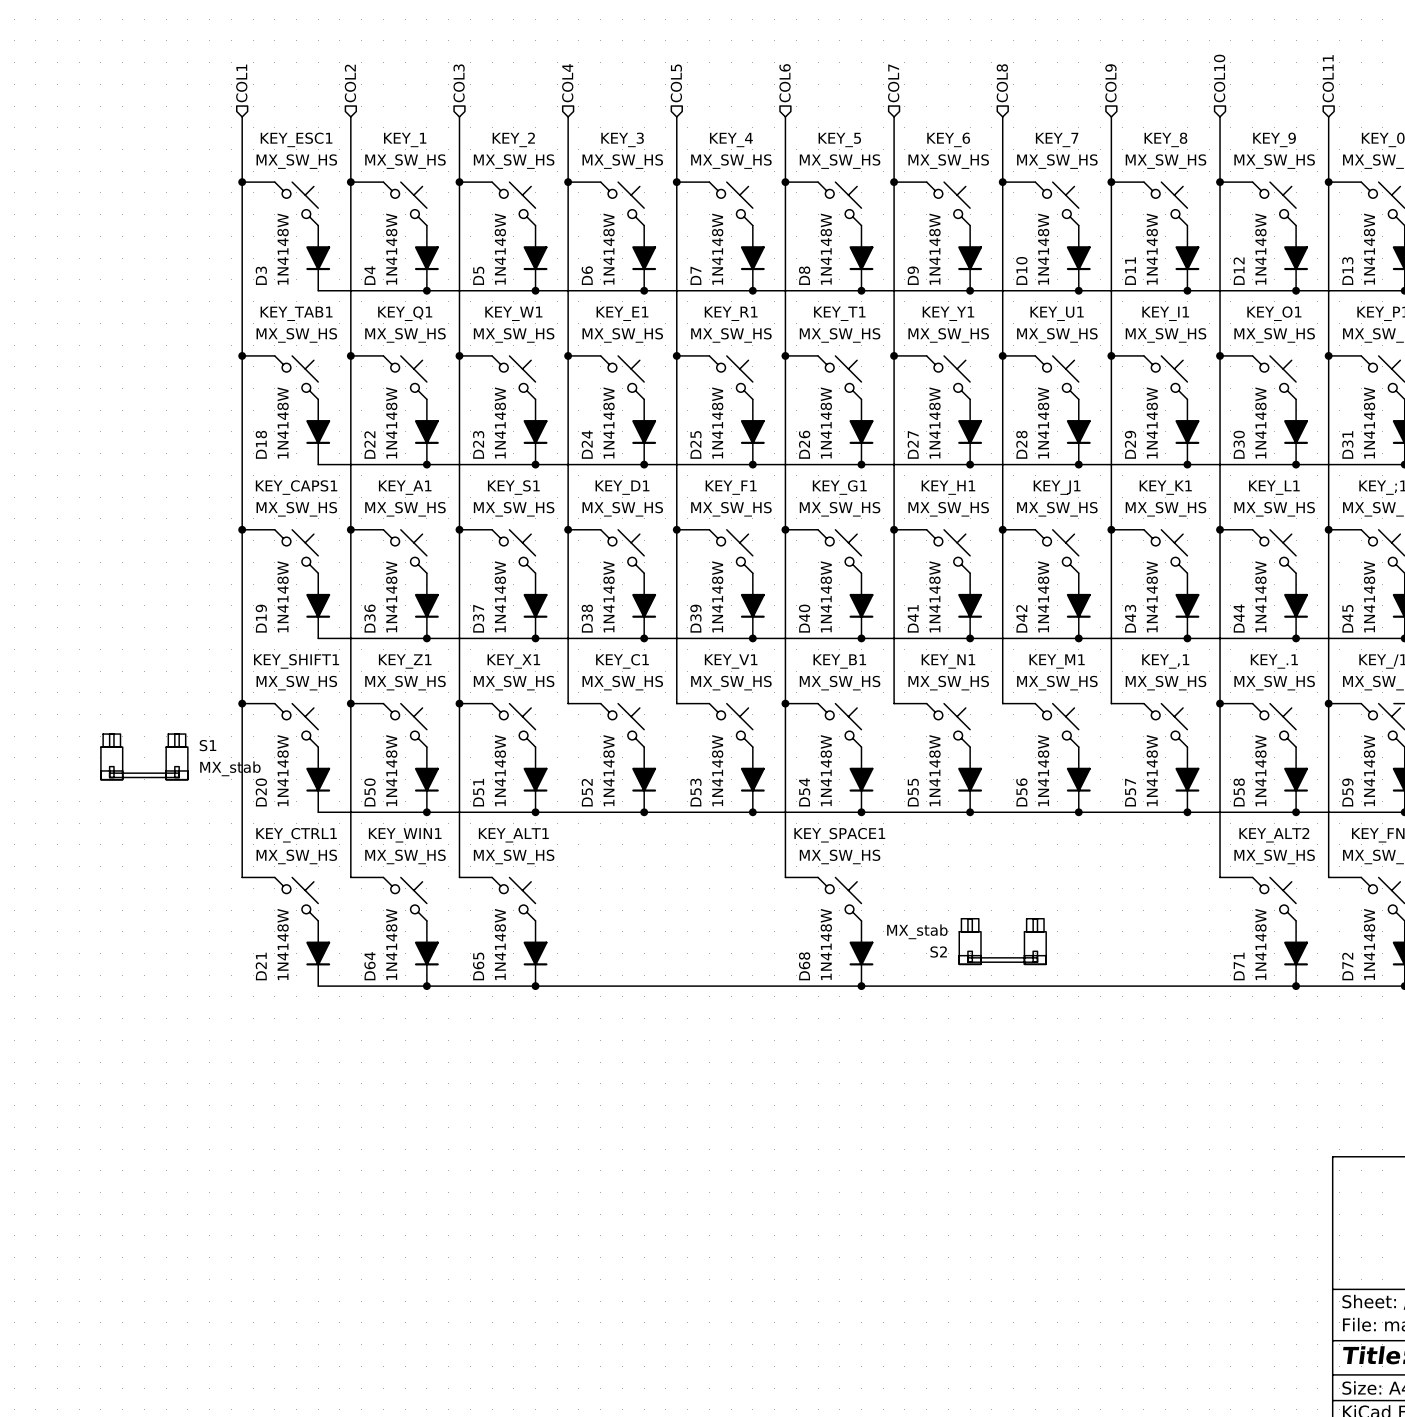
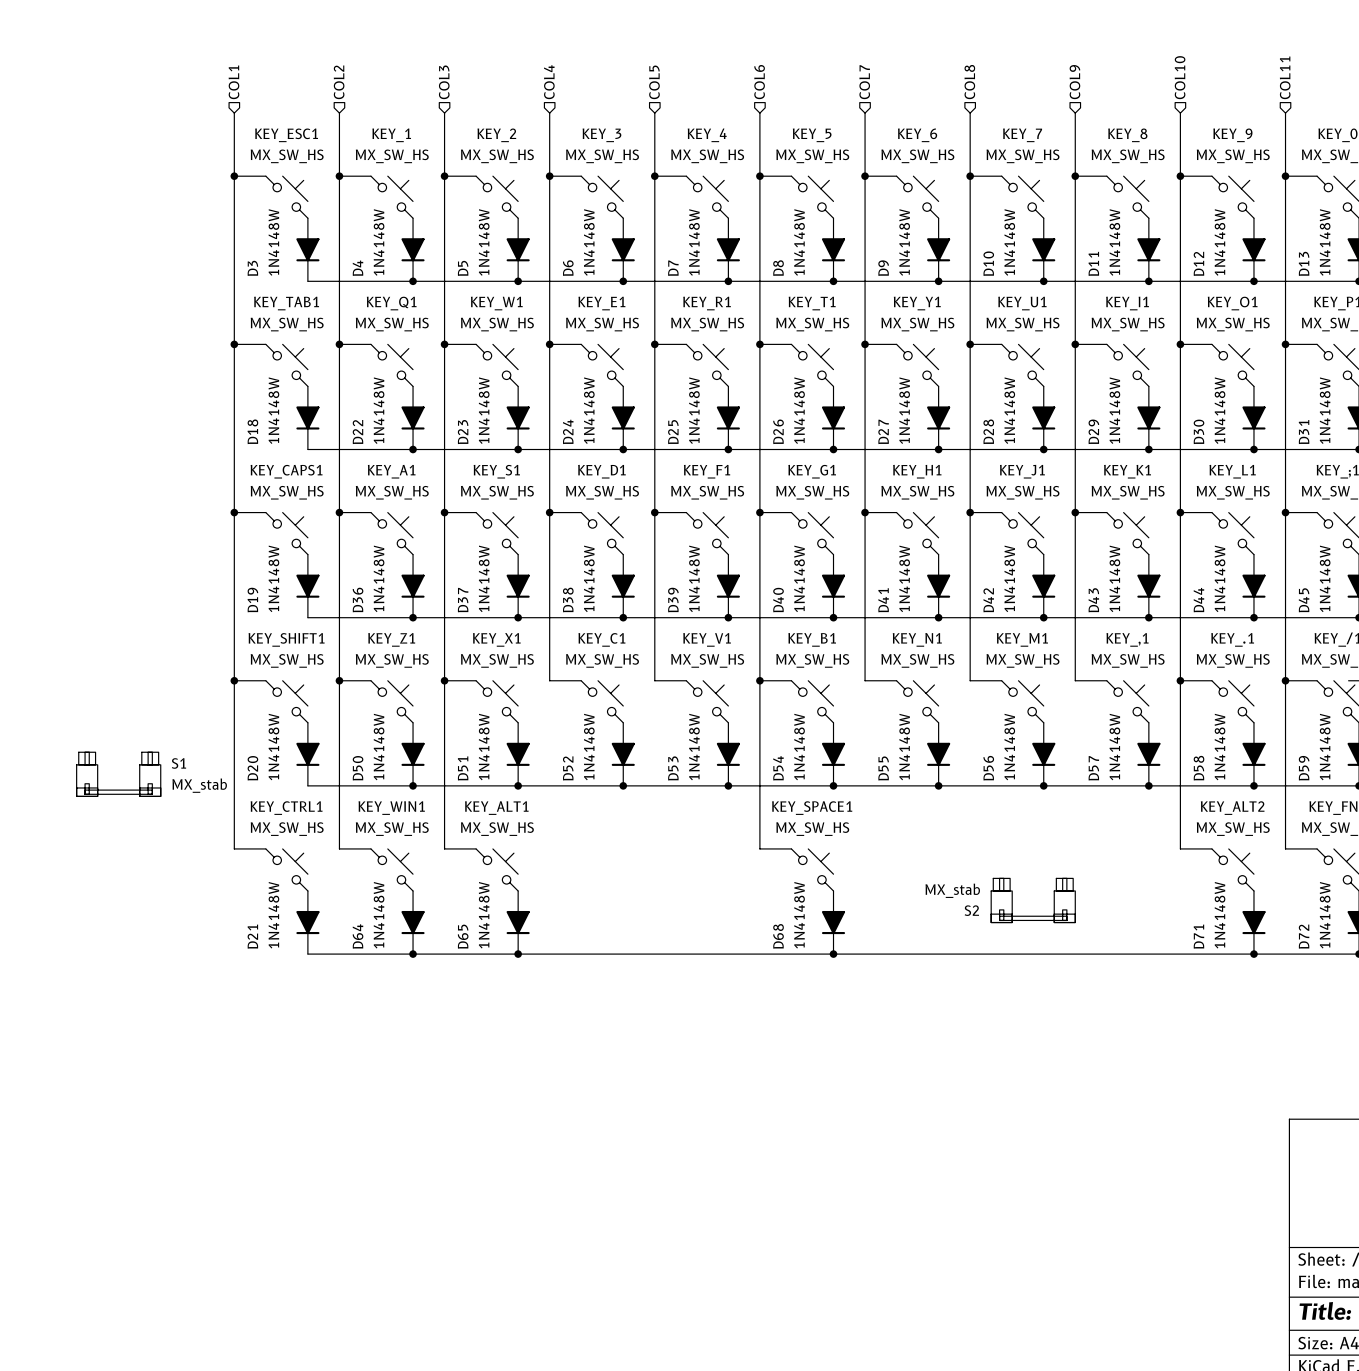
S1 position: (144, 756) -> (118, 774)
S2 position: (1002, 941) -> (1033, 900)

